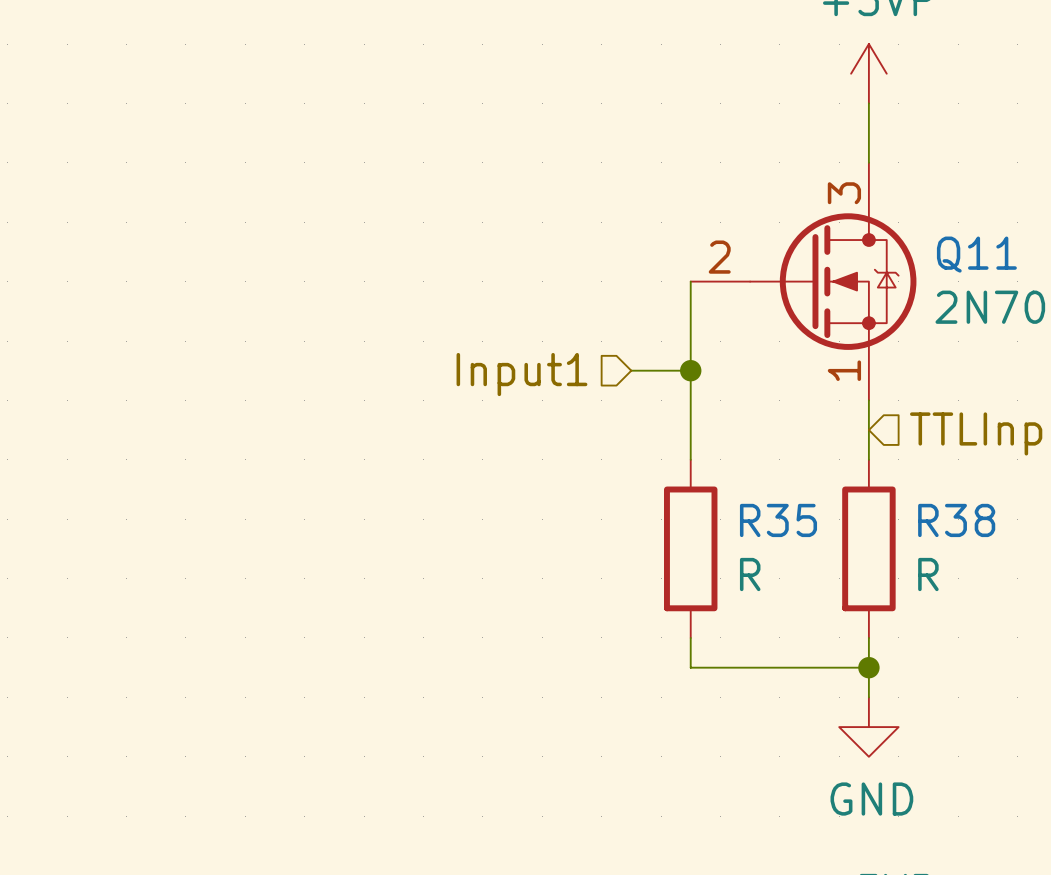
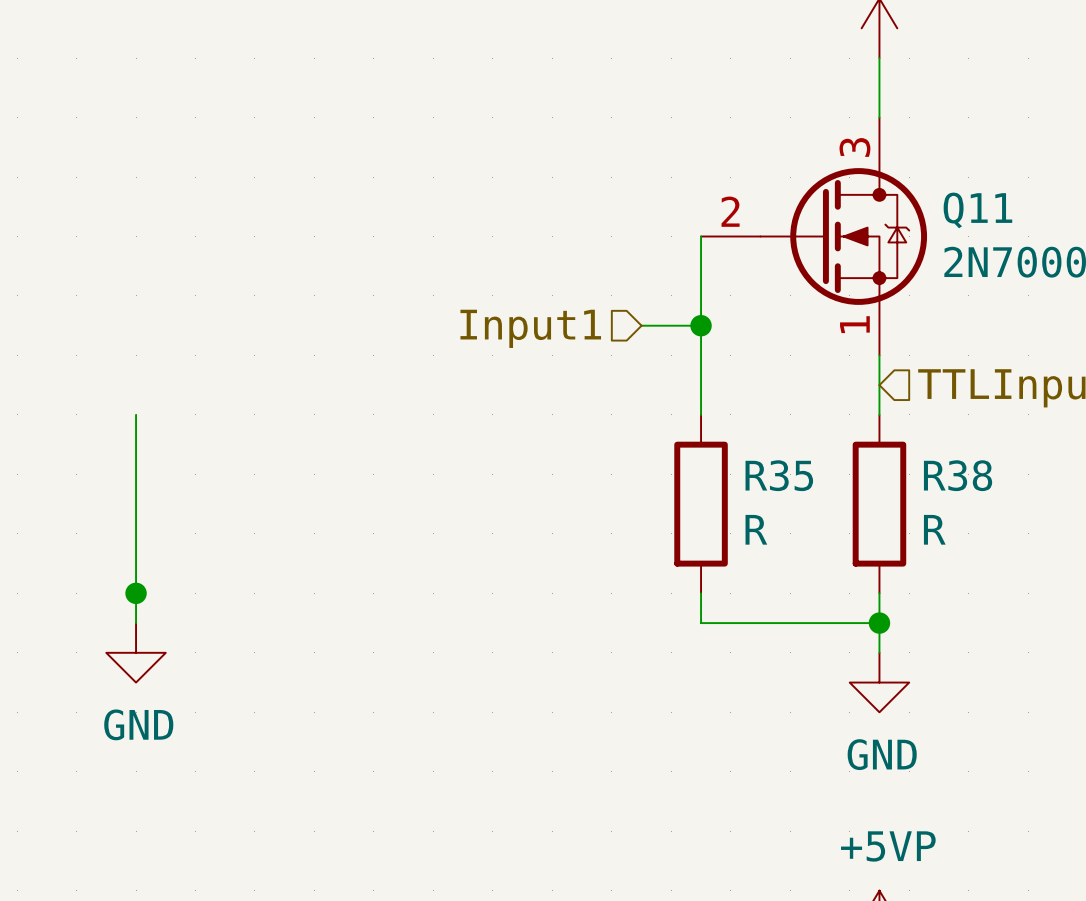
wire: none -> (136, 414) (136, 623)
junction: none -> (136, 593)
power symbol: none -> GND (136, 652)

